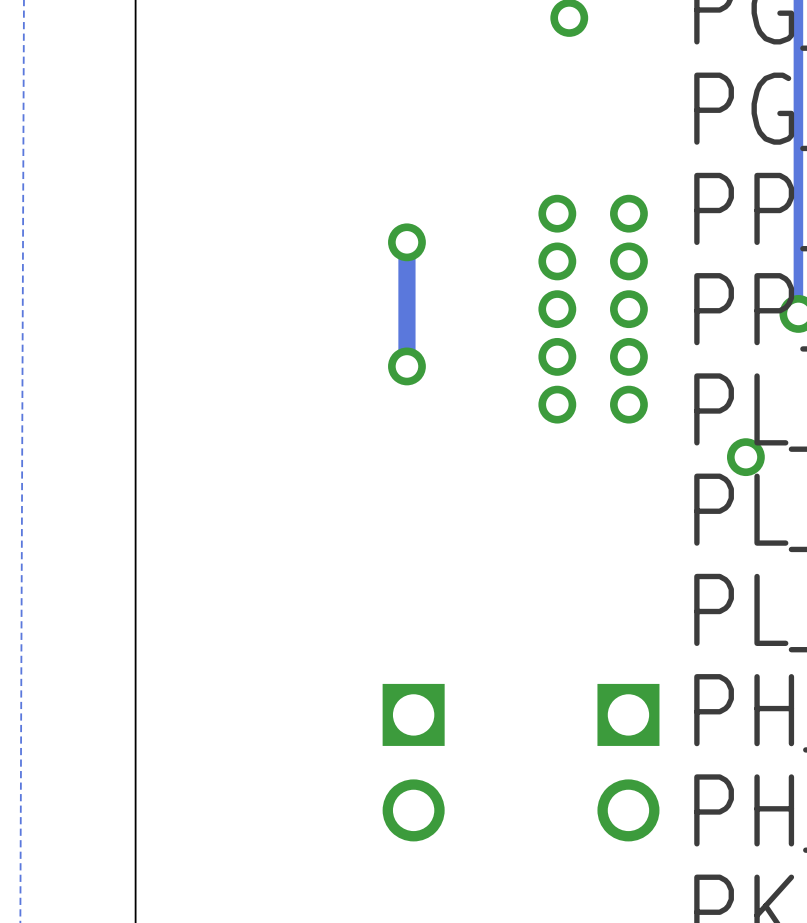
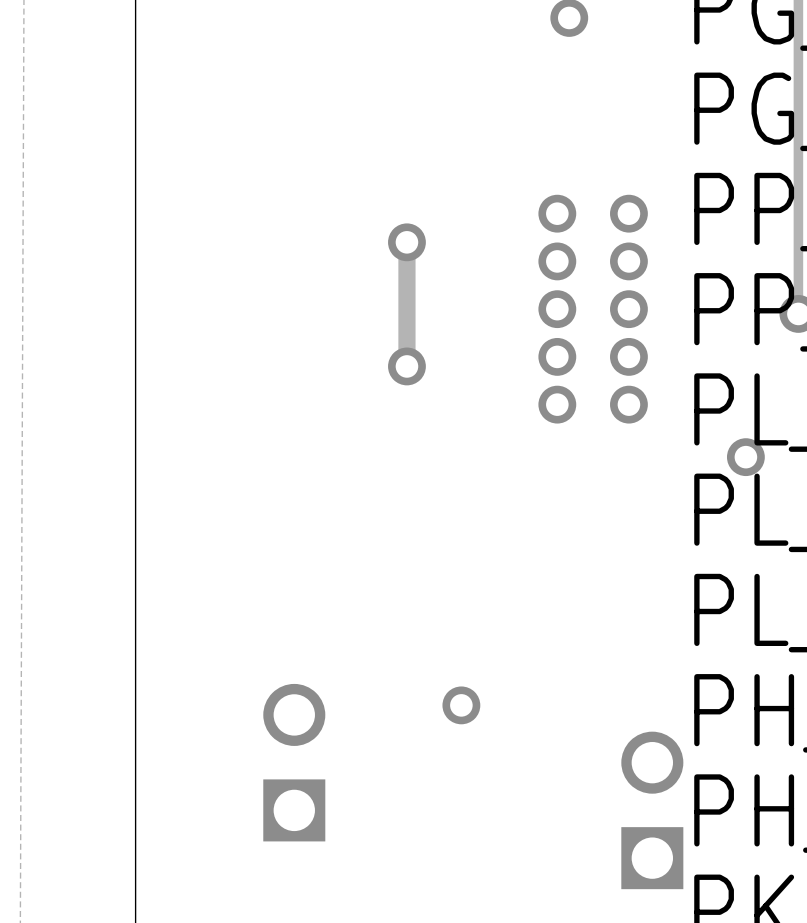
via: none -> (461, 705)
part rotation: 0° (413, 762) -> 180° (294, 762)
part position: (413, 762) -> (294, 762)
part rotation: 0° (628, 762) -> 180° (652, 810)

